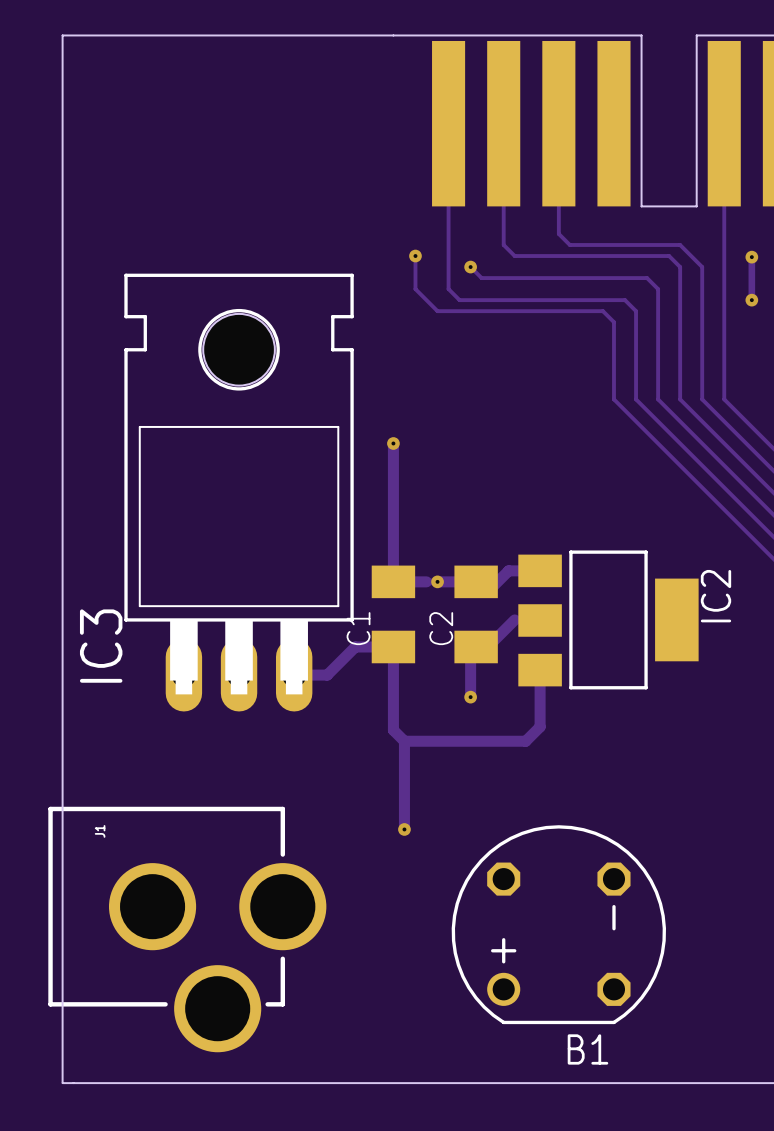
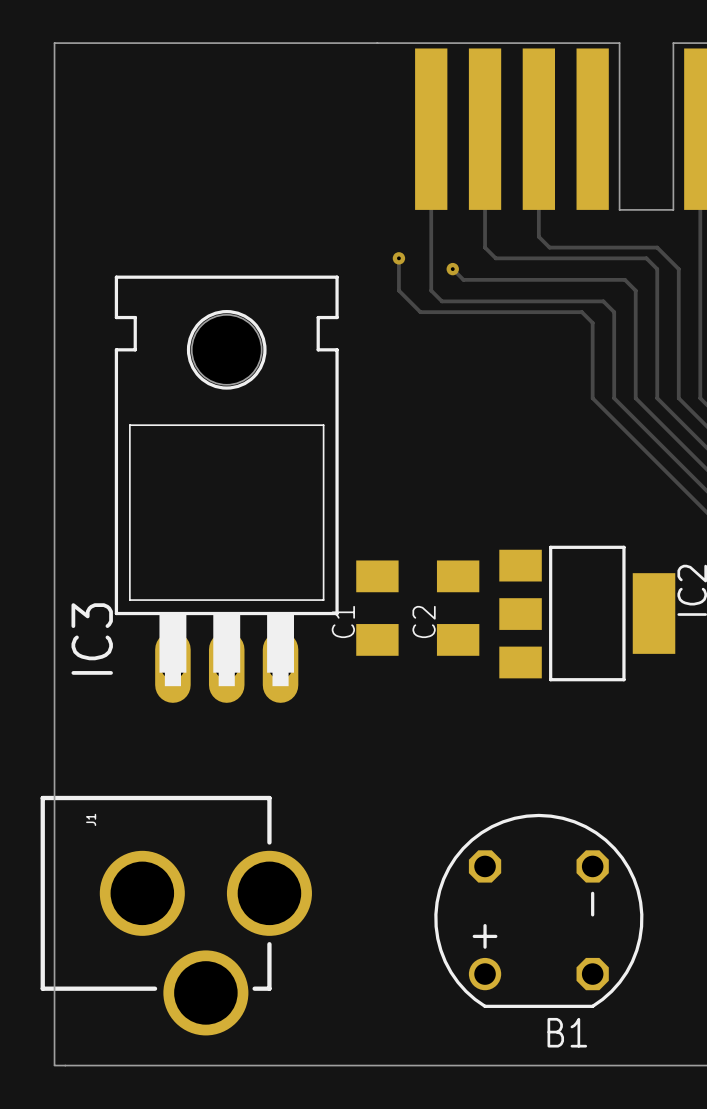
track: (393, 443) (393, 581) (476, 581) (481, 586) (492, 586) (508, 570) (540, 570) -> none
via: (393, 443) -> none
via: (437, 581) -> none
track: (540, 620) (514, 619) (487, 646) (476, 646) (470, 652) (470, 697) -> none
track: (540, 670) (540, 726) (525, 741) (404, 741) -> none
track: (294, 675) (327, 675) (355, 646) (393, 646) (393, 730) (404, 741) -> none
via: (470, 697) -> none
track: (404, 741) (404, 829) -> none
via: (404, 829) -> none

